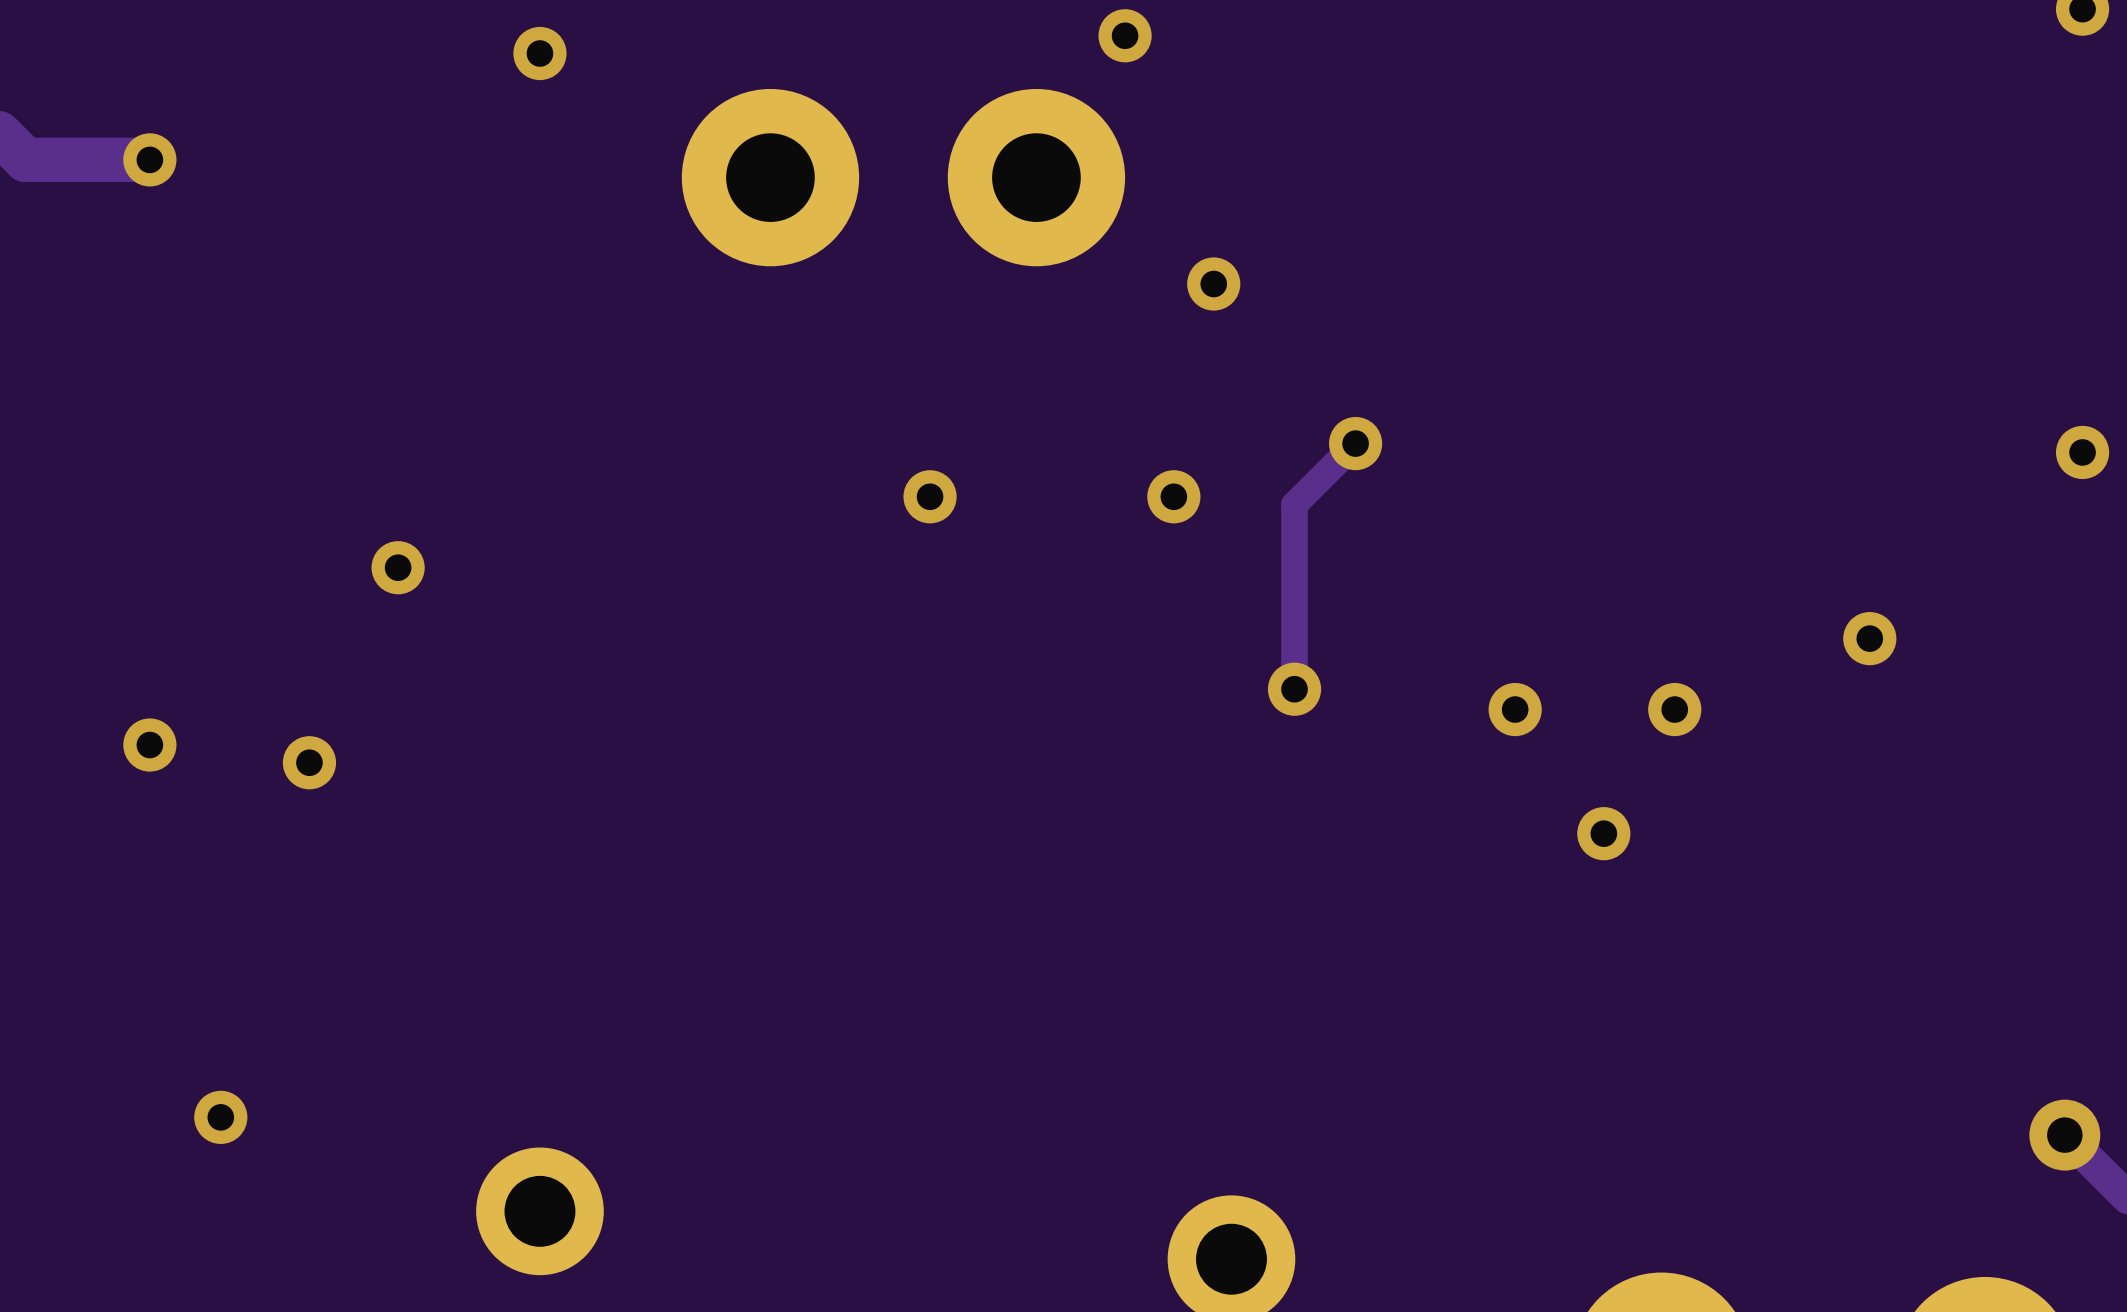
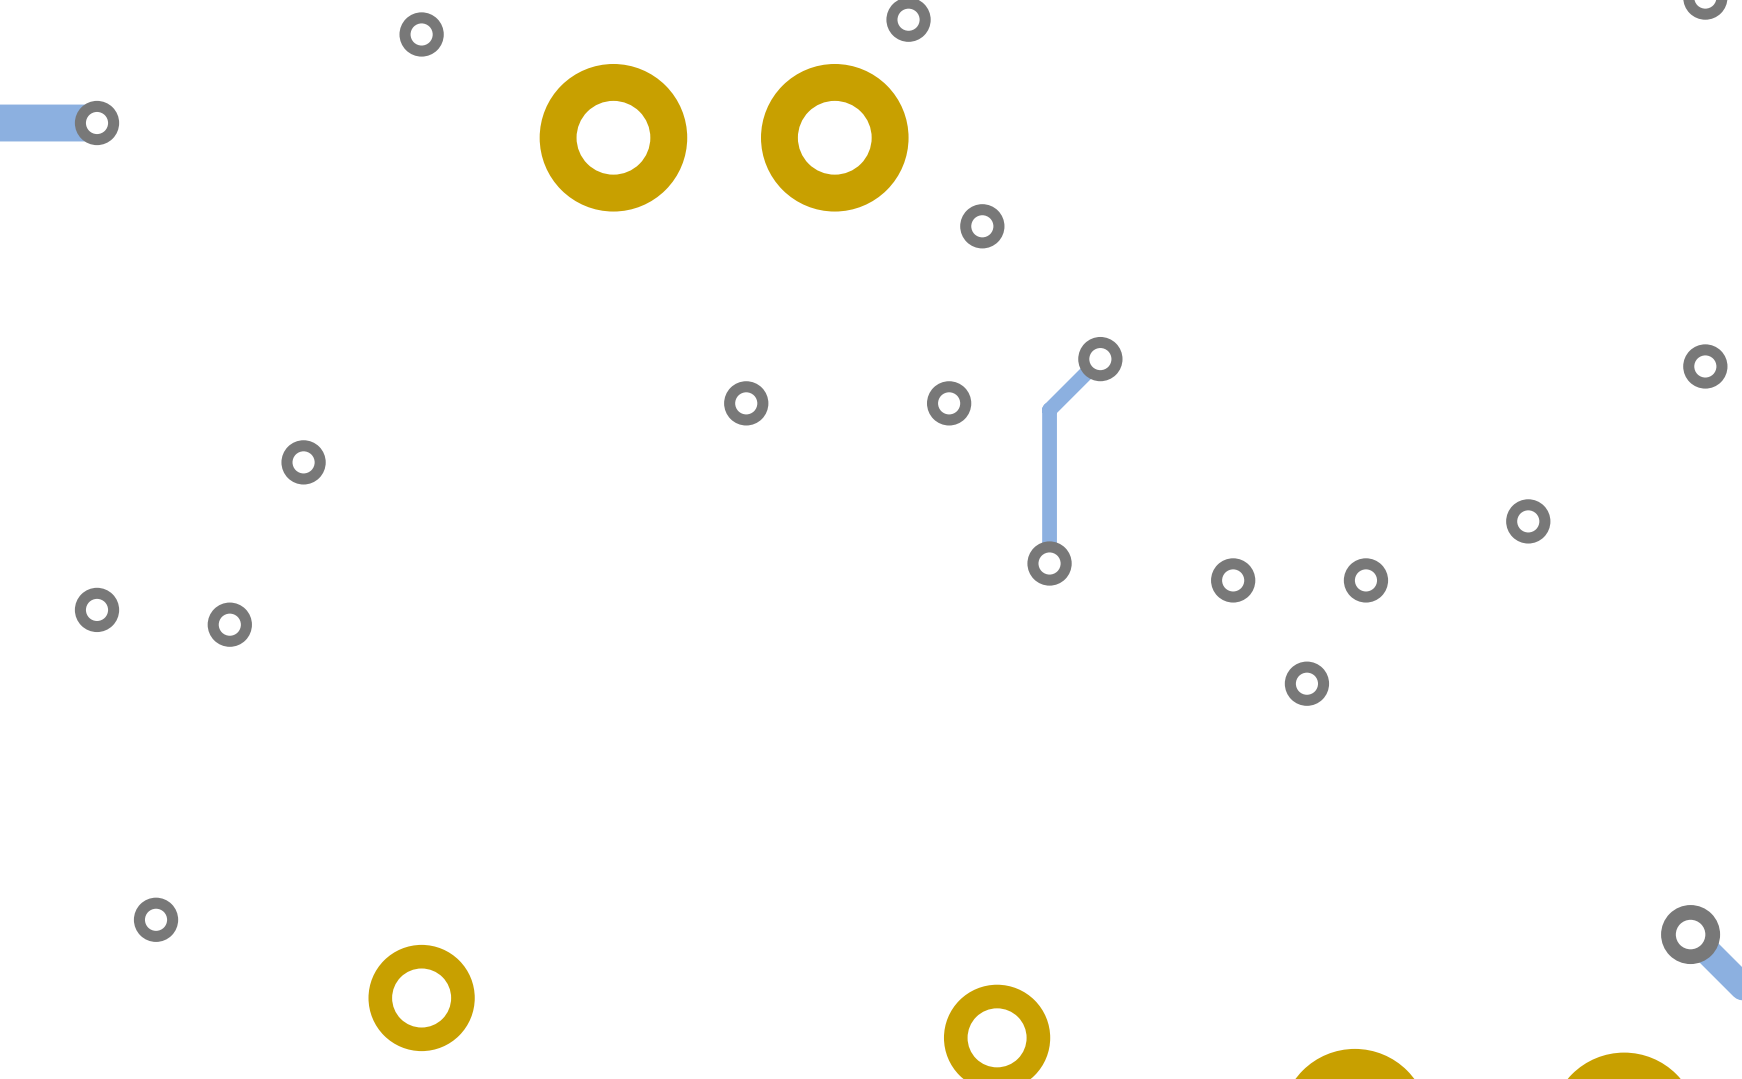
track width: thick (1355, 443) (1294, 504) (1294, 689) -> thin (1100, 359) (1049, 409) (1049, 563)

